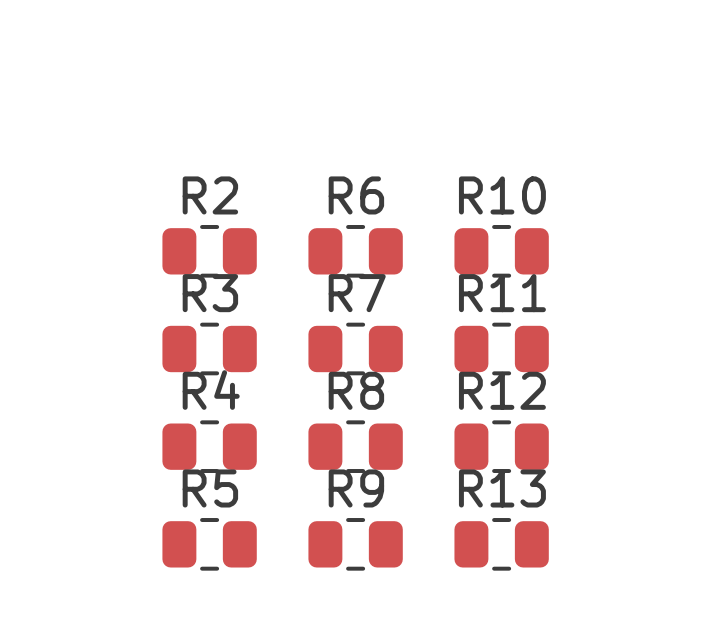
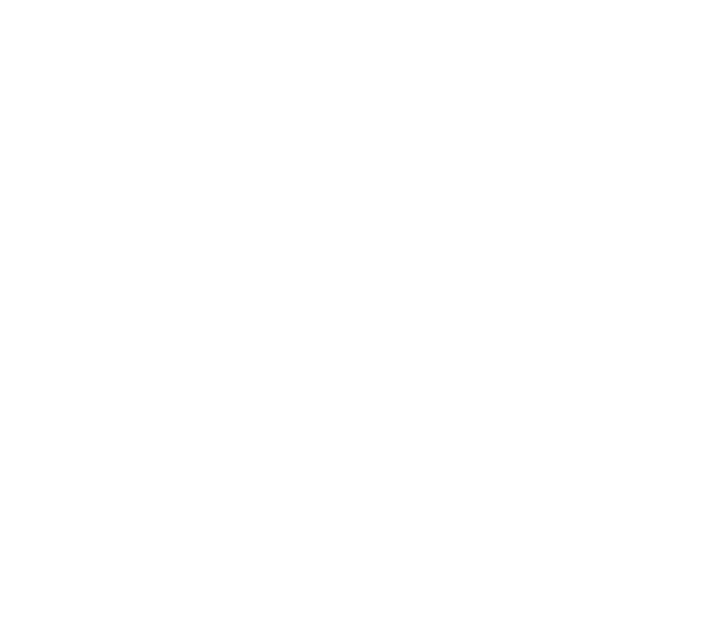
R2: (209, 251) -> none
R6: (355, 251) -> none
R10: (501, 251) -> none
R3: (209, 348) -> none
R7: (355, 348) -> none
R11: (501, 348) -> none
R4: (209, 446) -> none
R8: (355, 446) -> none
R12: (501, 446) -> none
R5: (209, 544) -> none
R9: (355, 544) -> none
R13: (501, 544) -> none

